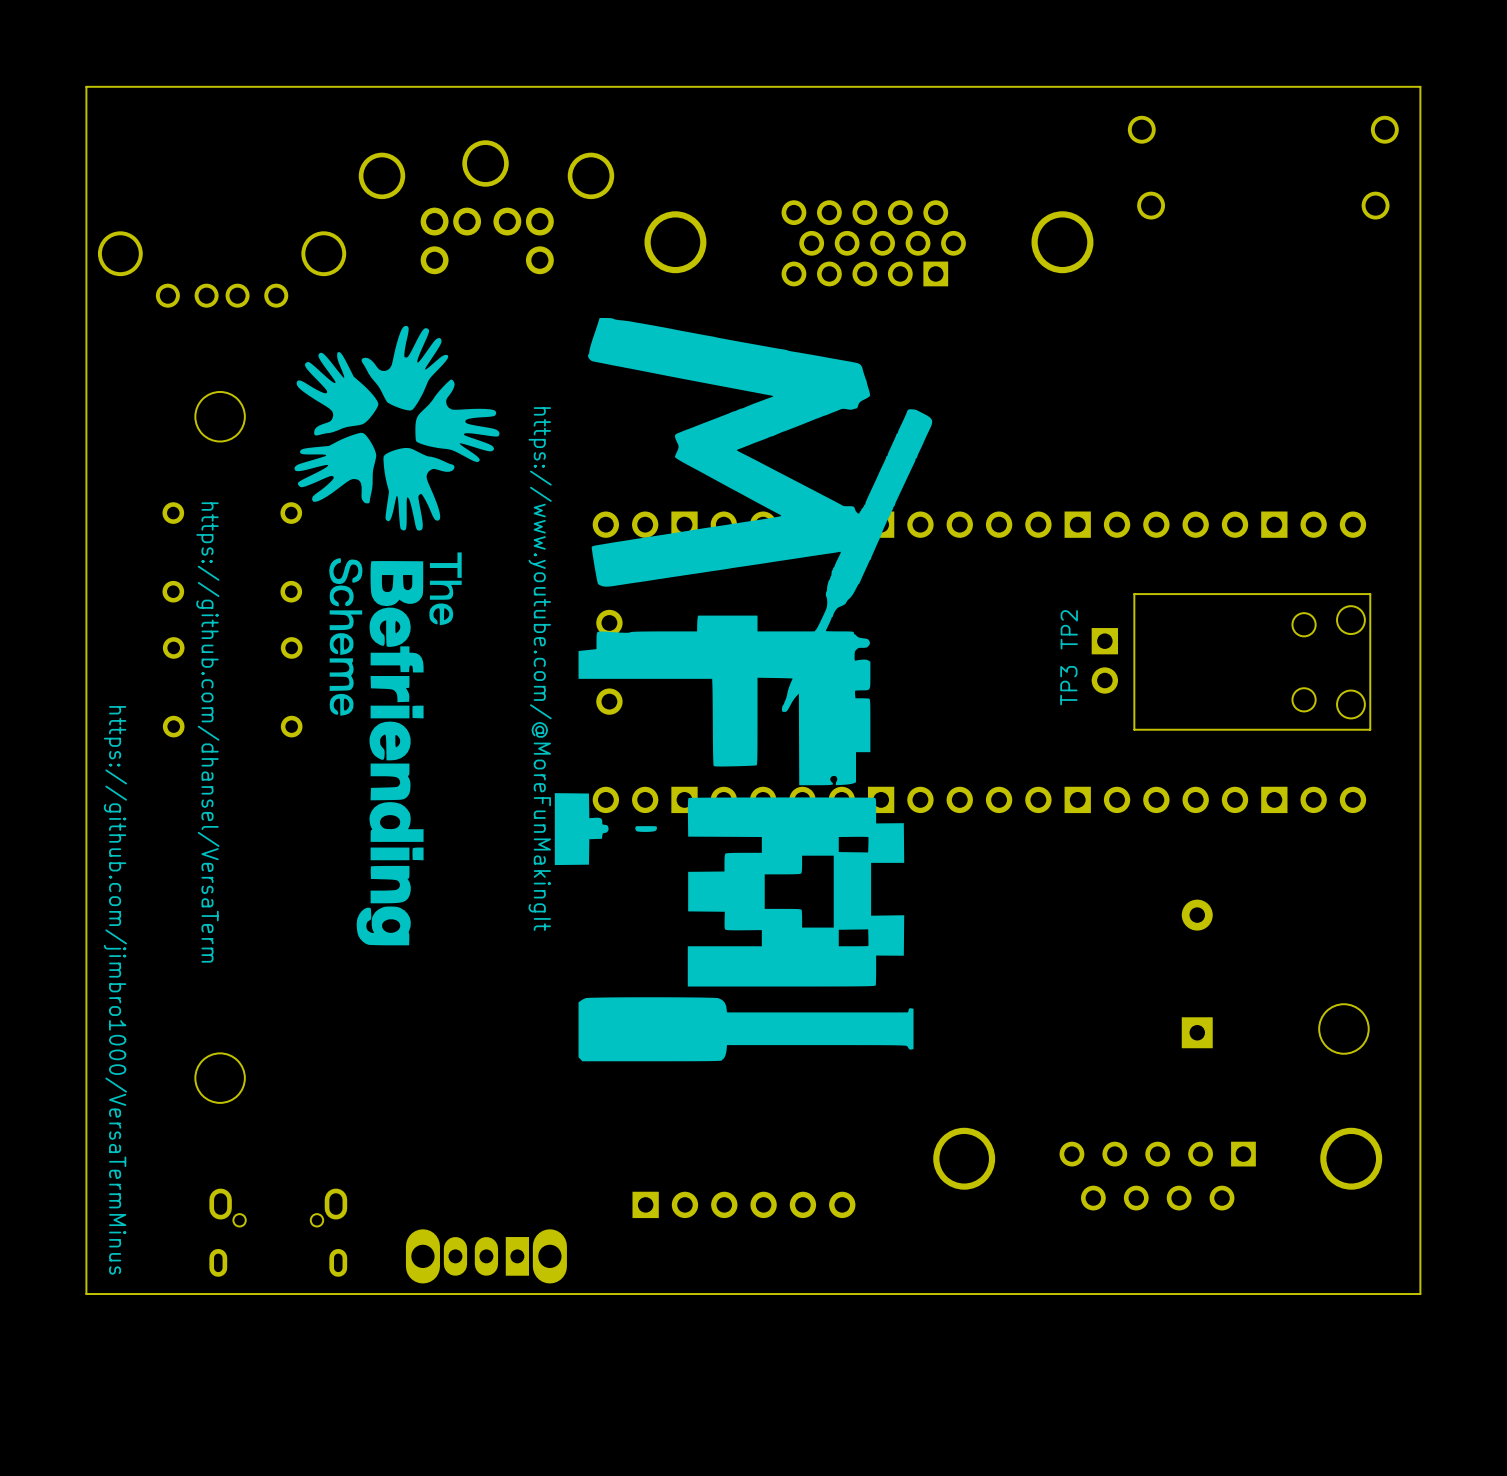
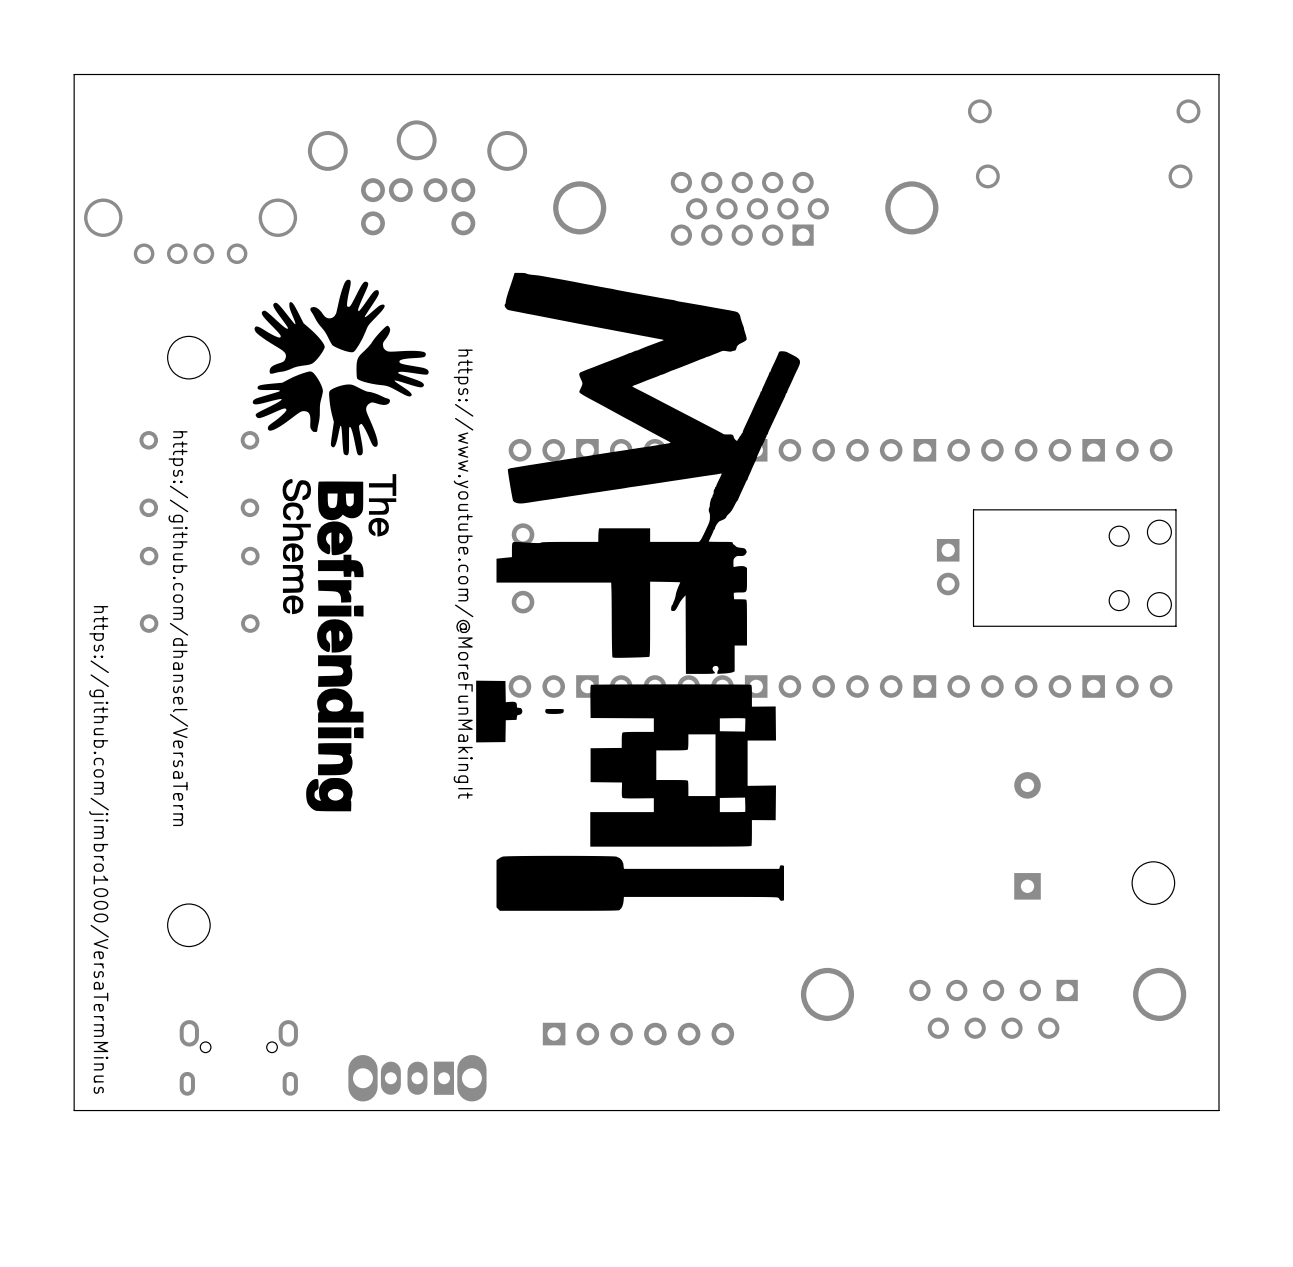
text: TP2 (1069, 629) -> none
text: TP3 (1068, 685) -> none

